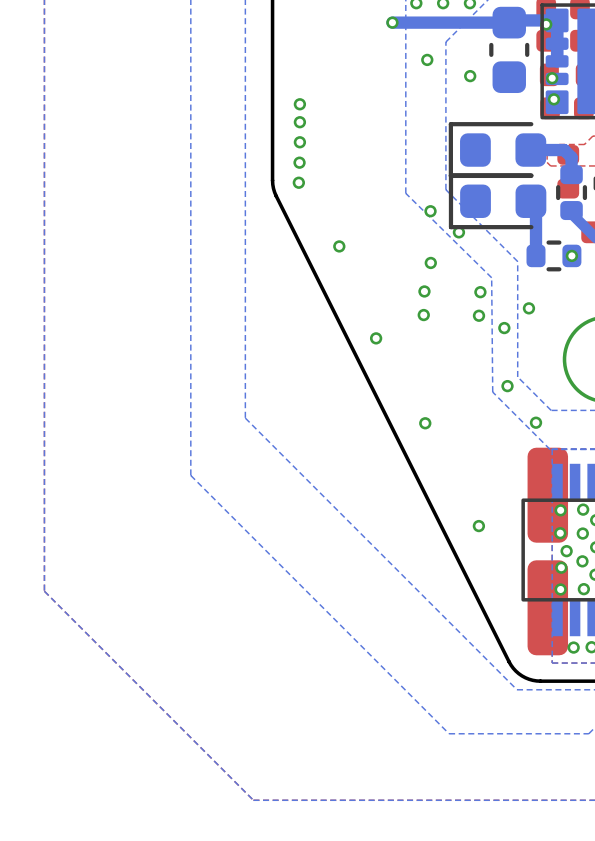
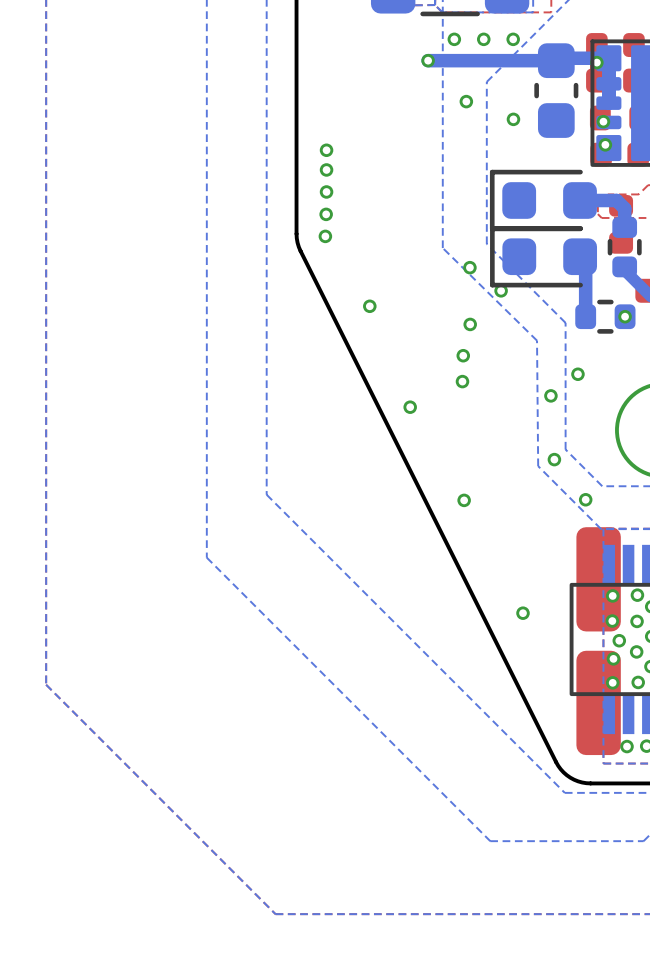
via: (480, 292) -> none
via: (479, 315) -> none

